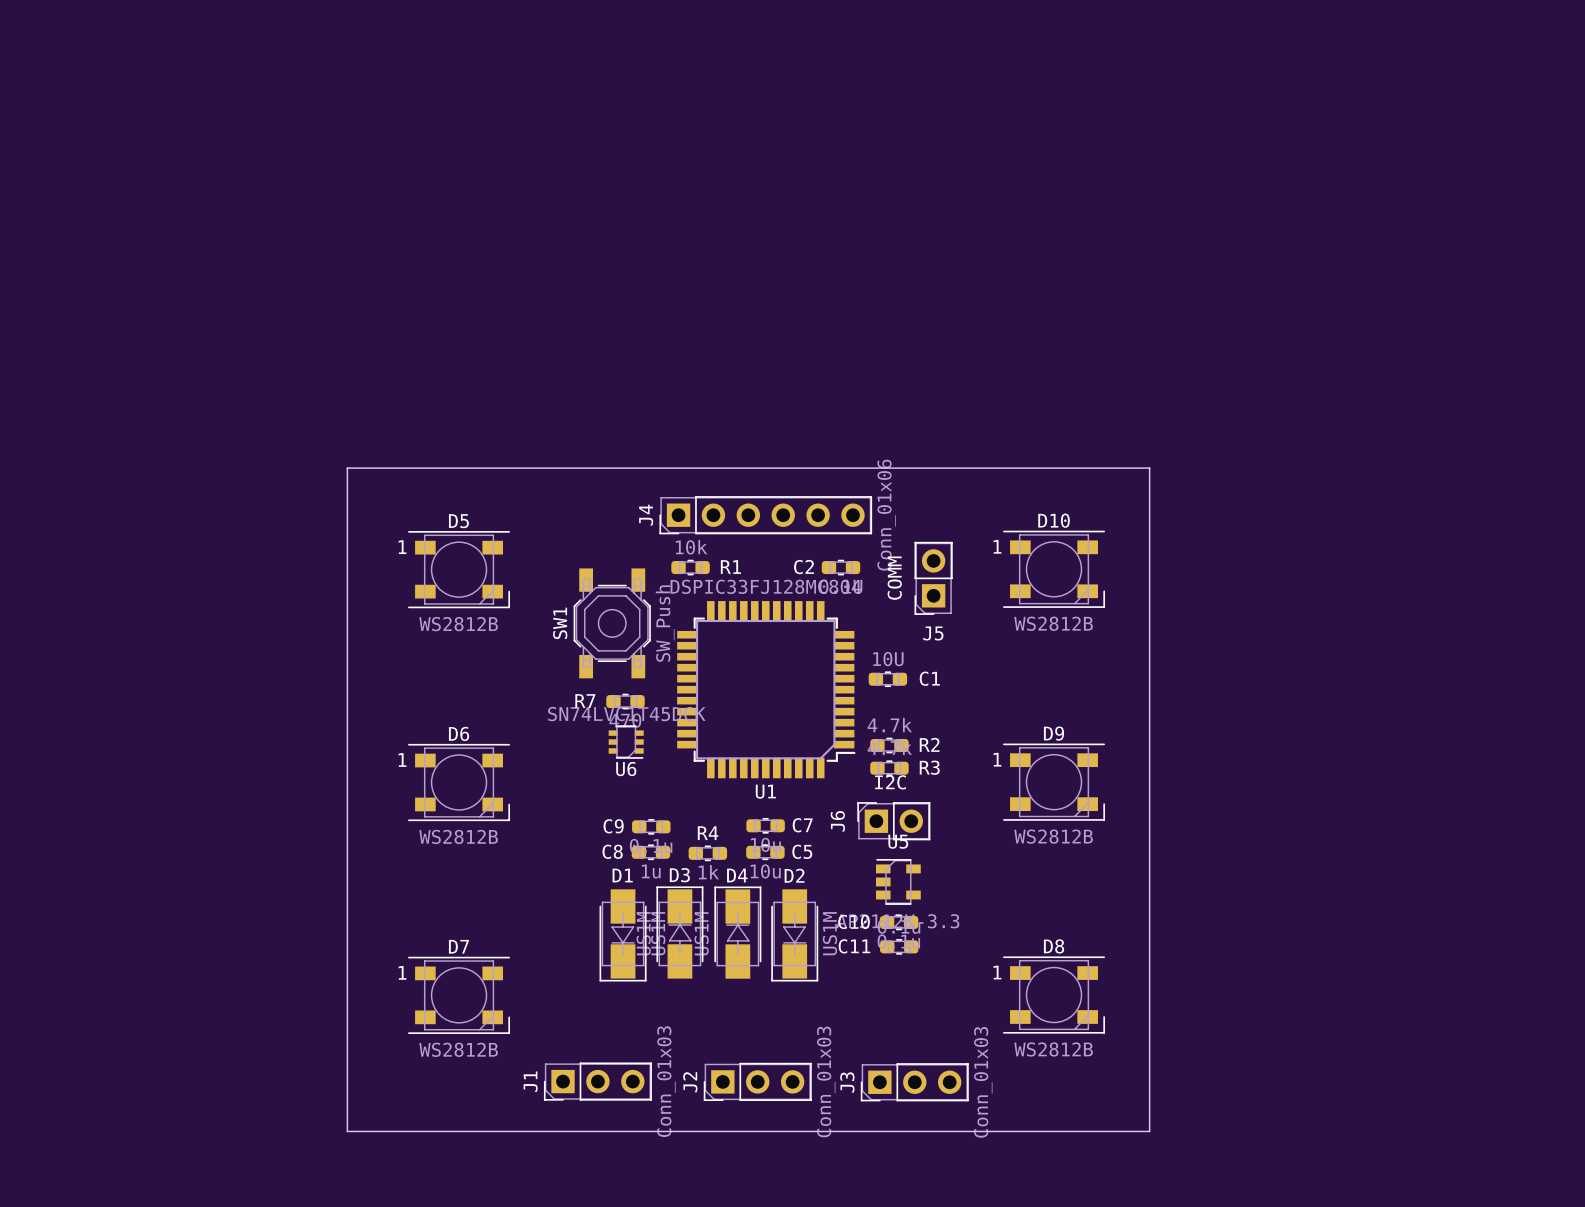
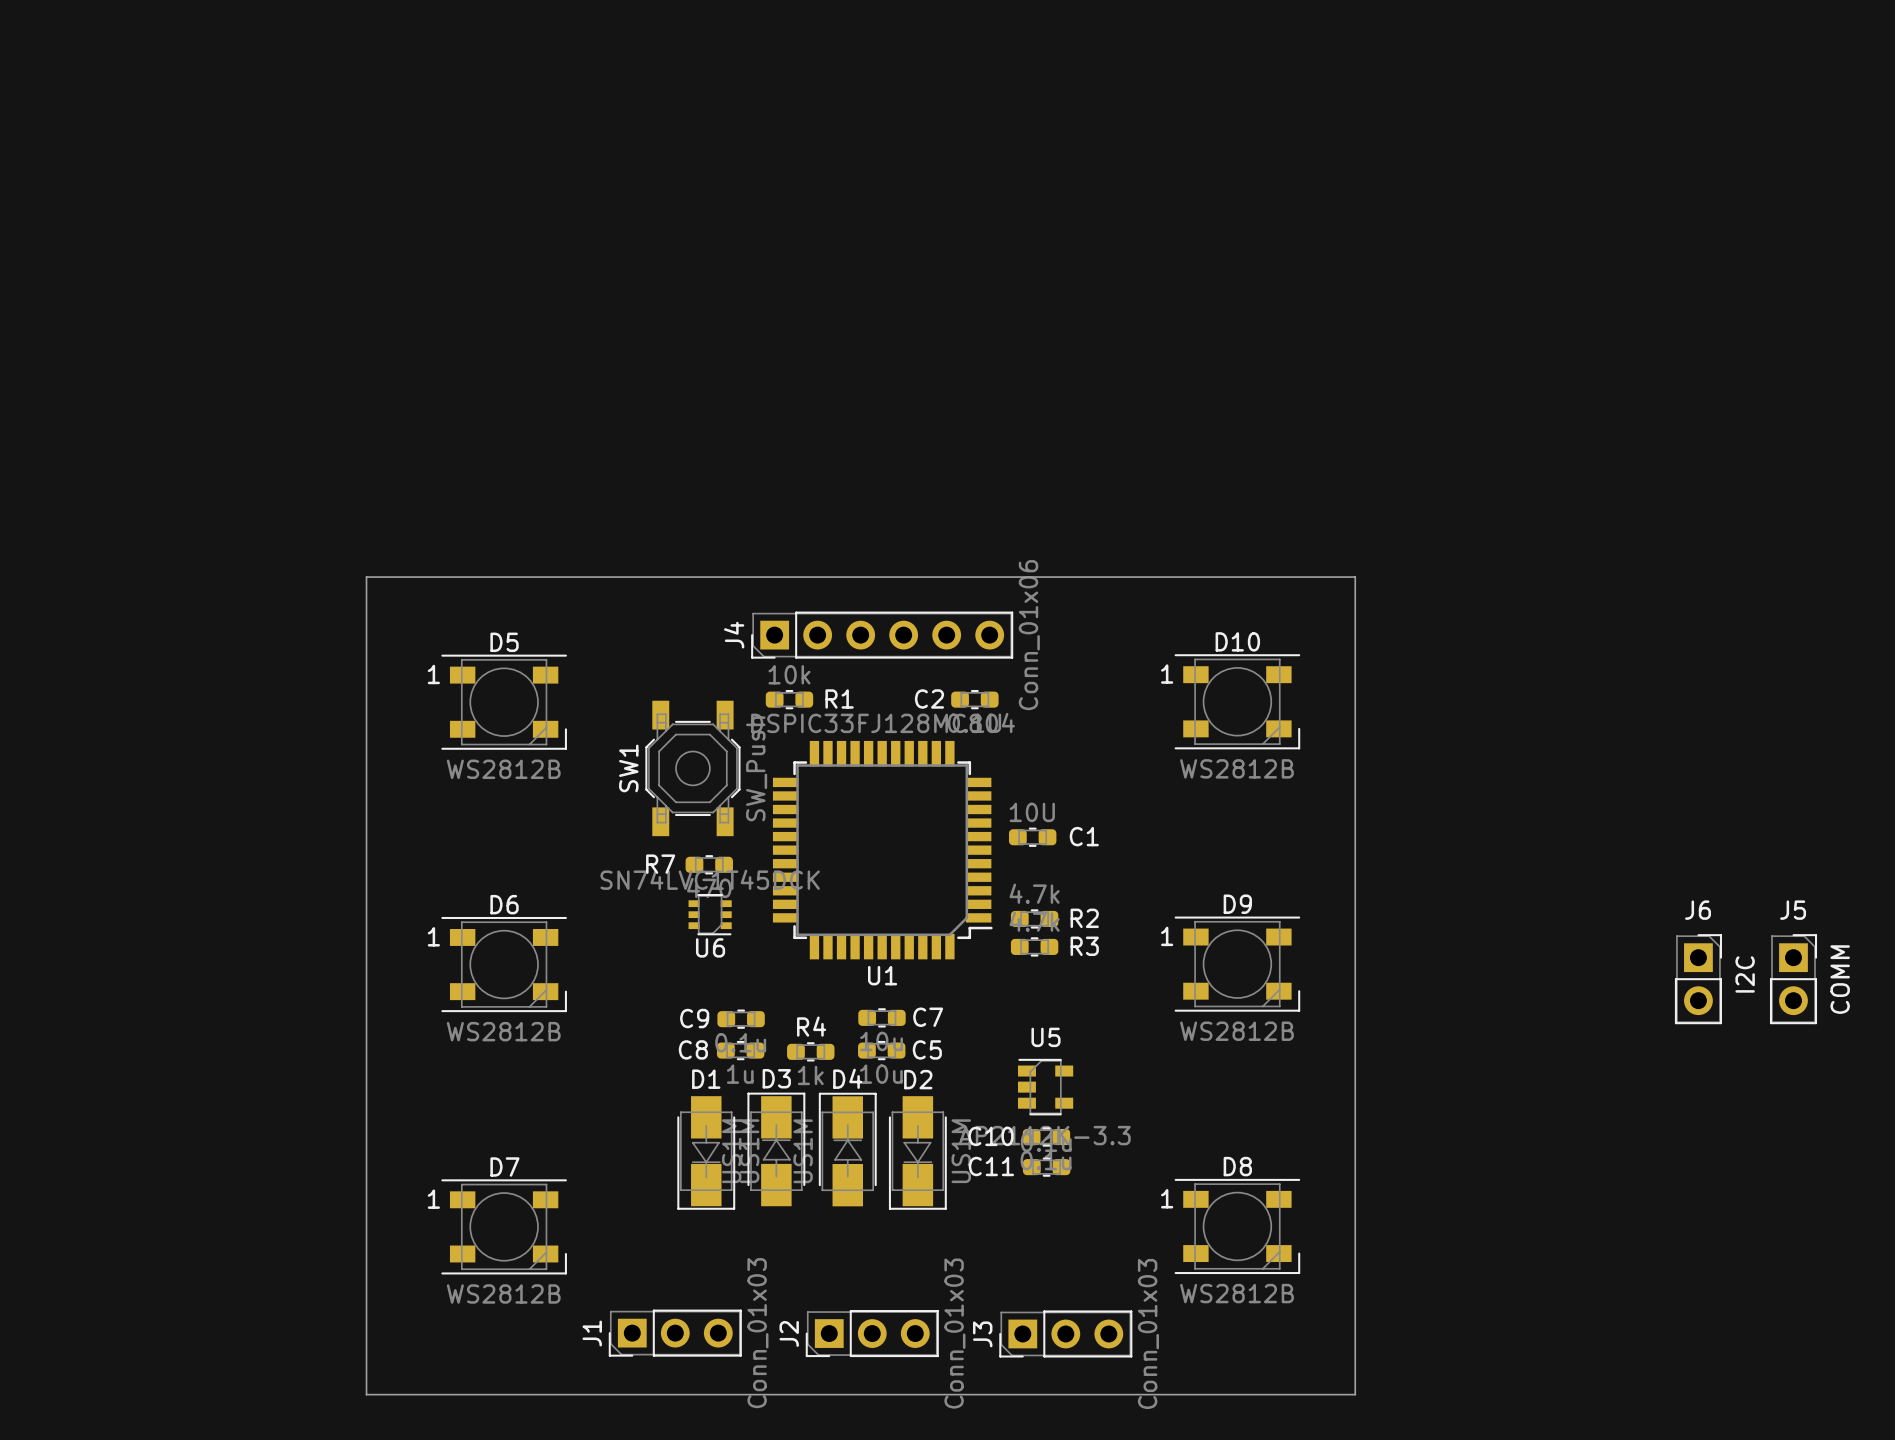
J5 rotation: 0° (933, 578) -> 180° (1793, 979)
J5 position: (933, 578) -> (1793, 979)
J6 rotation: 0° (893, 821) -> 90° clockwise (1698, 979)
J6 position: (893, 821) -> (1698, 979)

